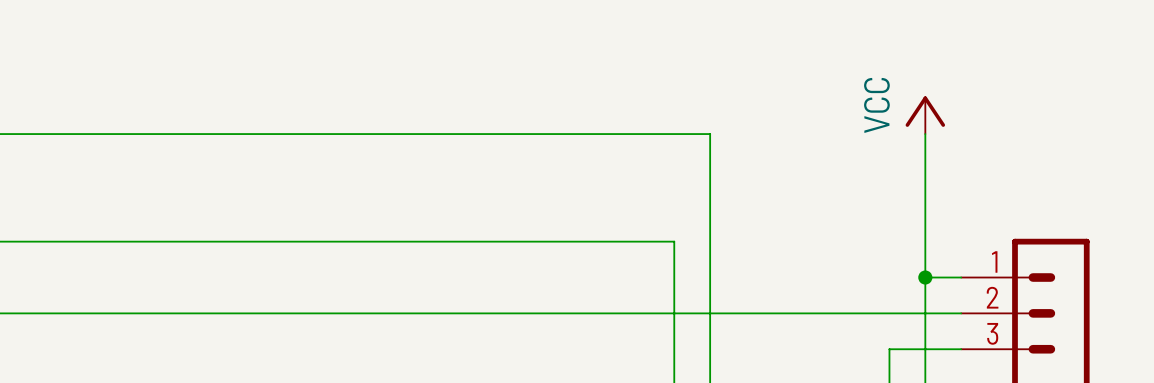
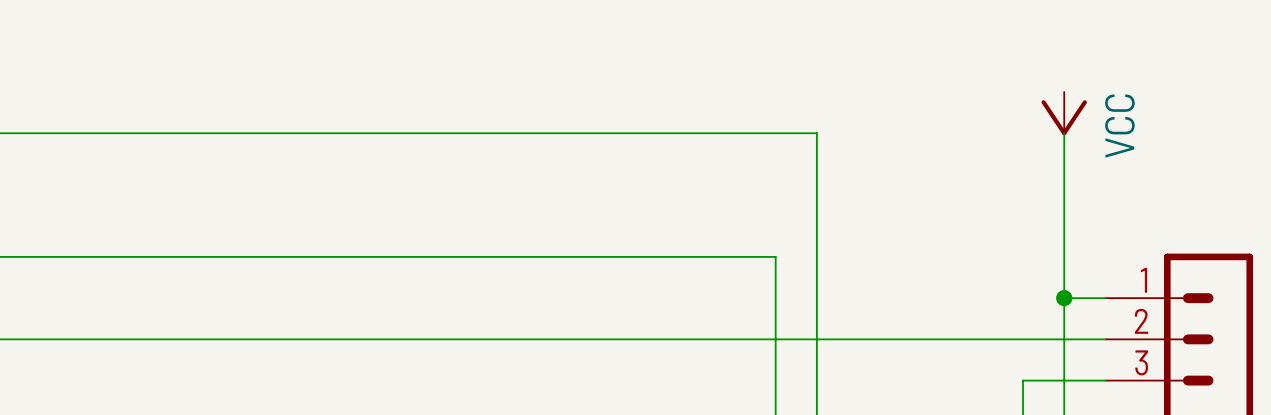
power symbol rotation: 0° (925, 111) -> 180° (1064, 117)

